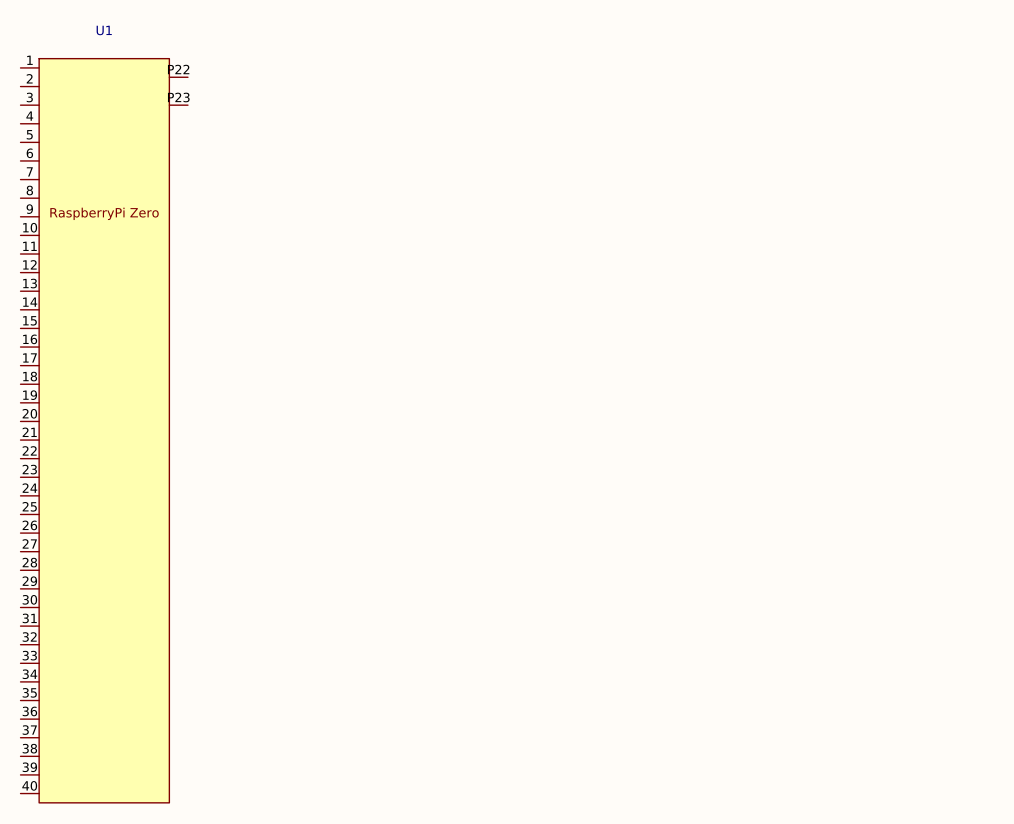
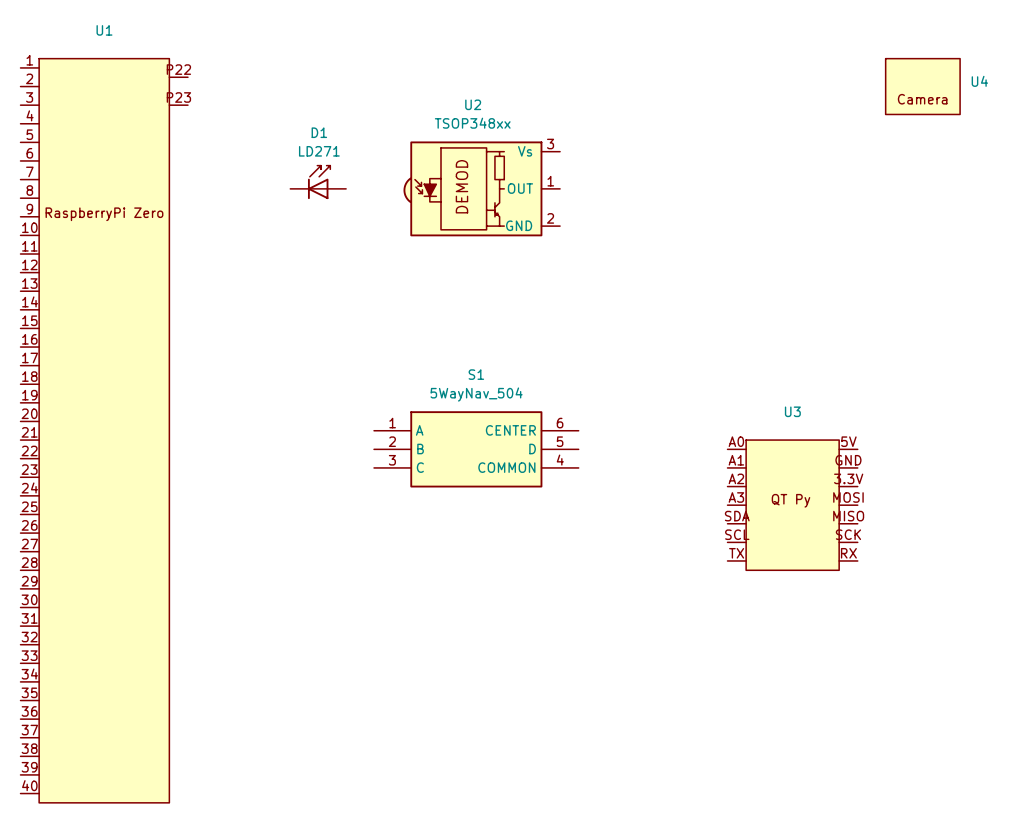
U4: none -> (922, 86)
D1: none -> LD271 (318, 182)
U2: none -> TSOP348xx (481, 188)
S1: none -> 5WayNav_504 (476, 449)
U3: none -> (792, 505)

